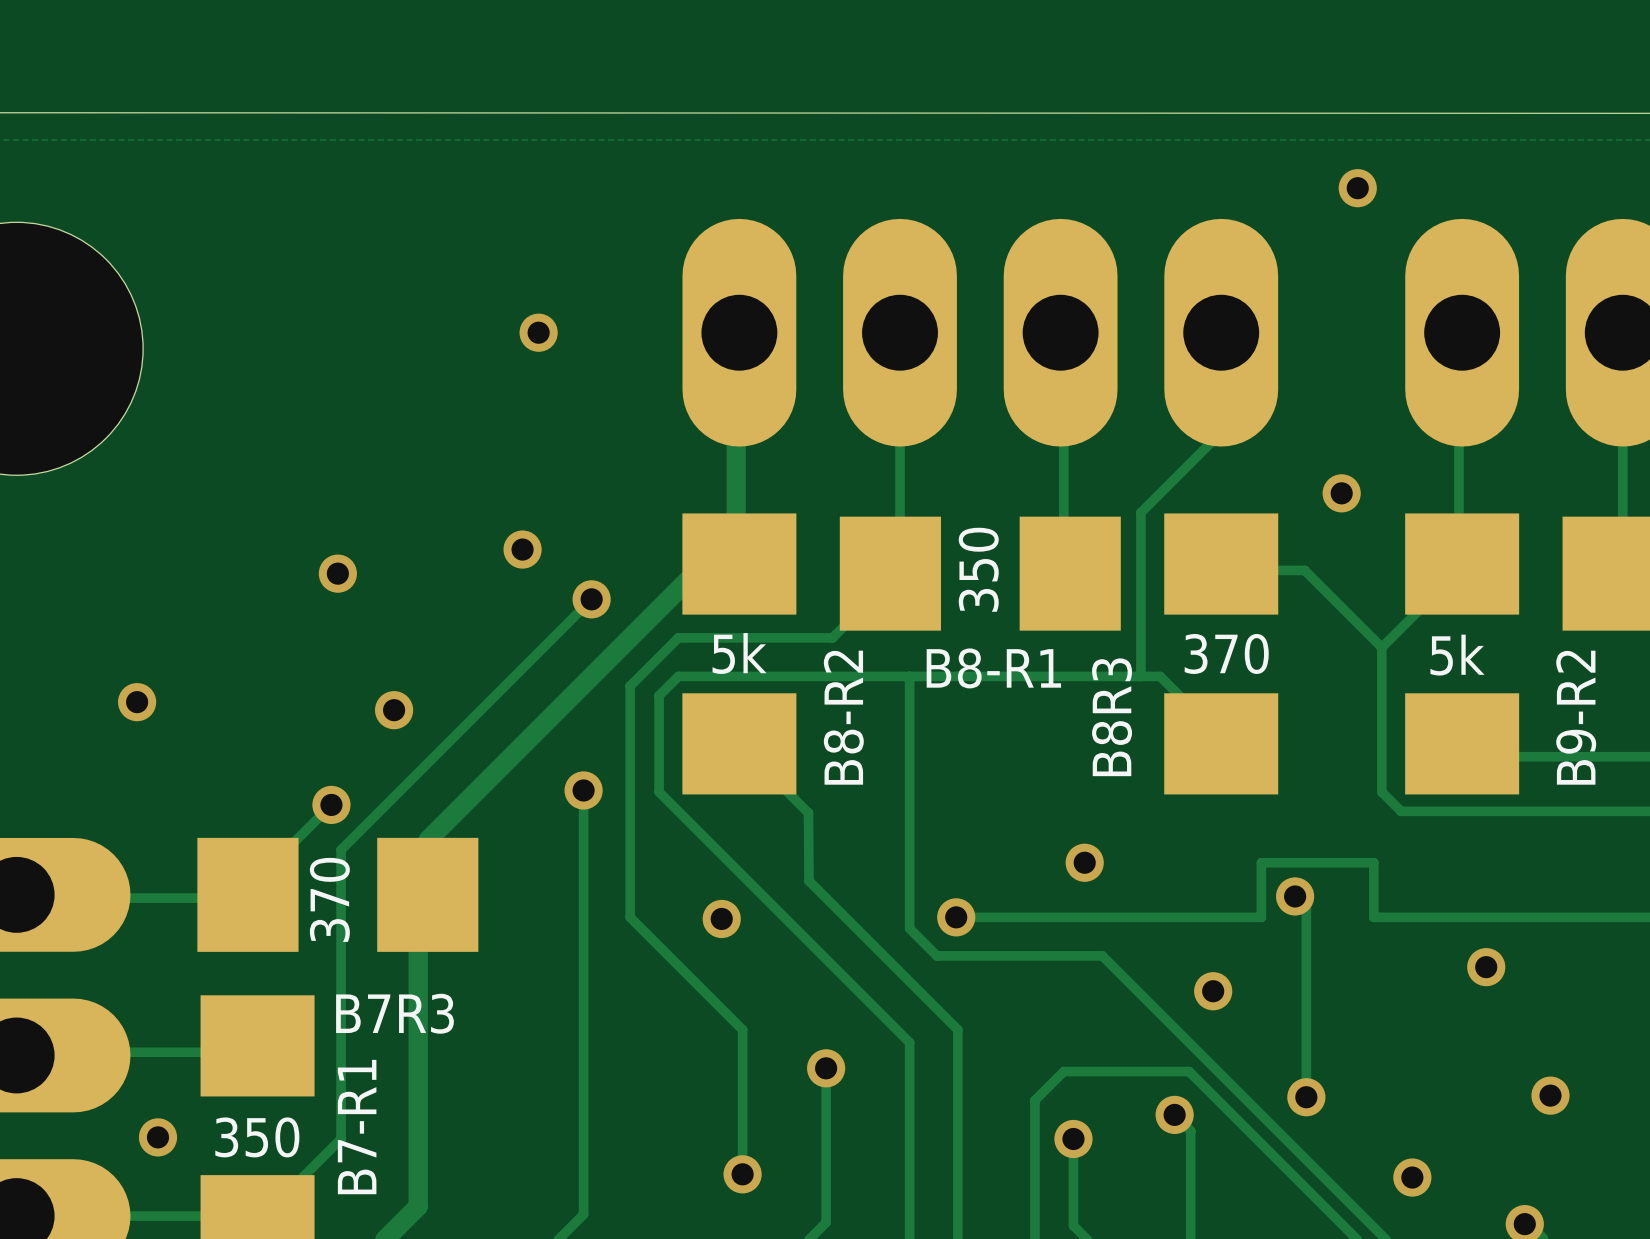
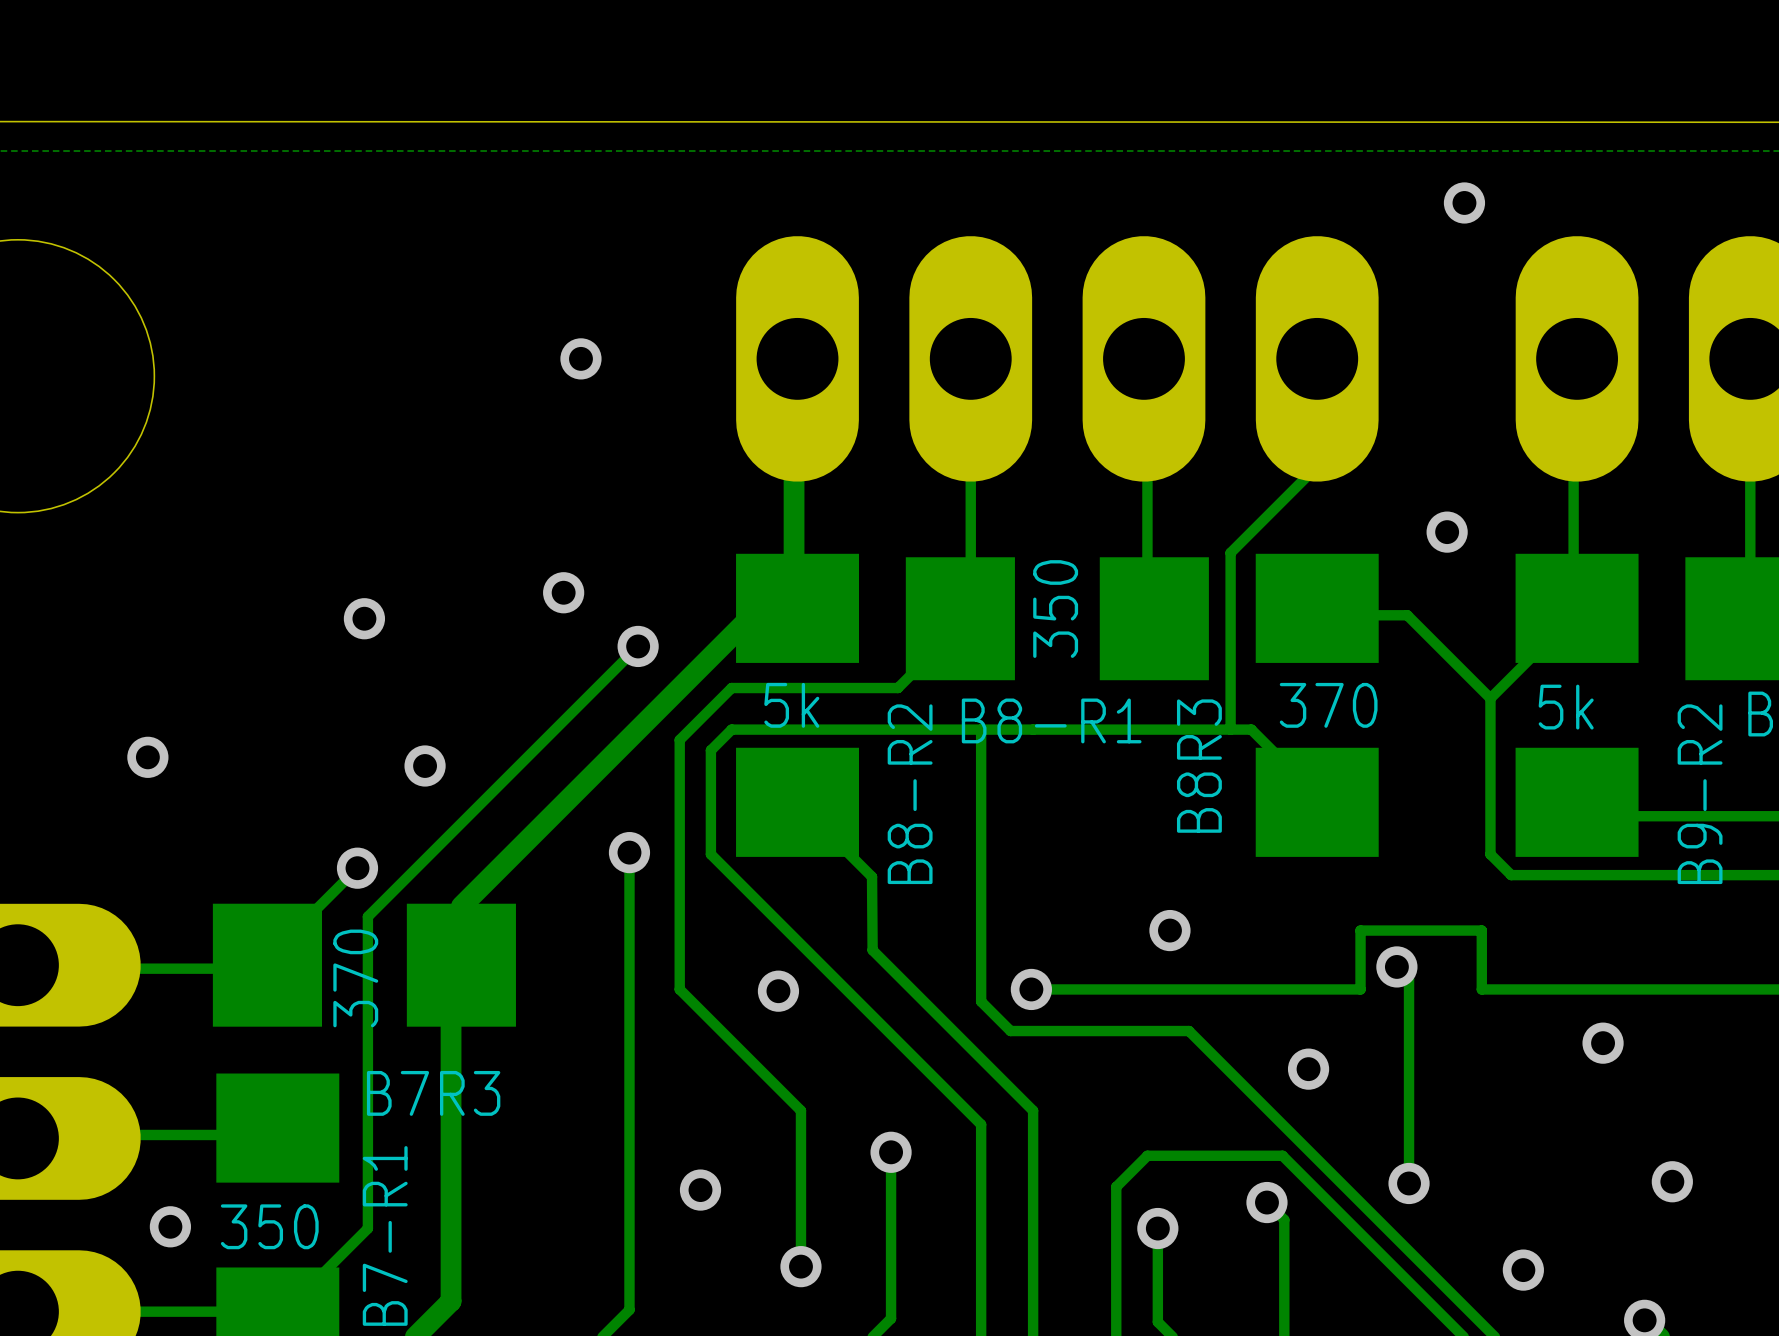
via: none -> (700, 1190)

